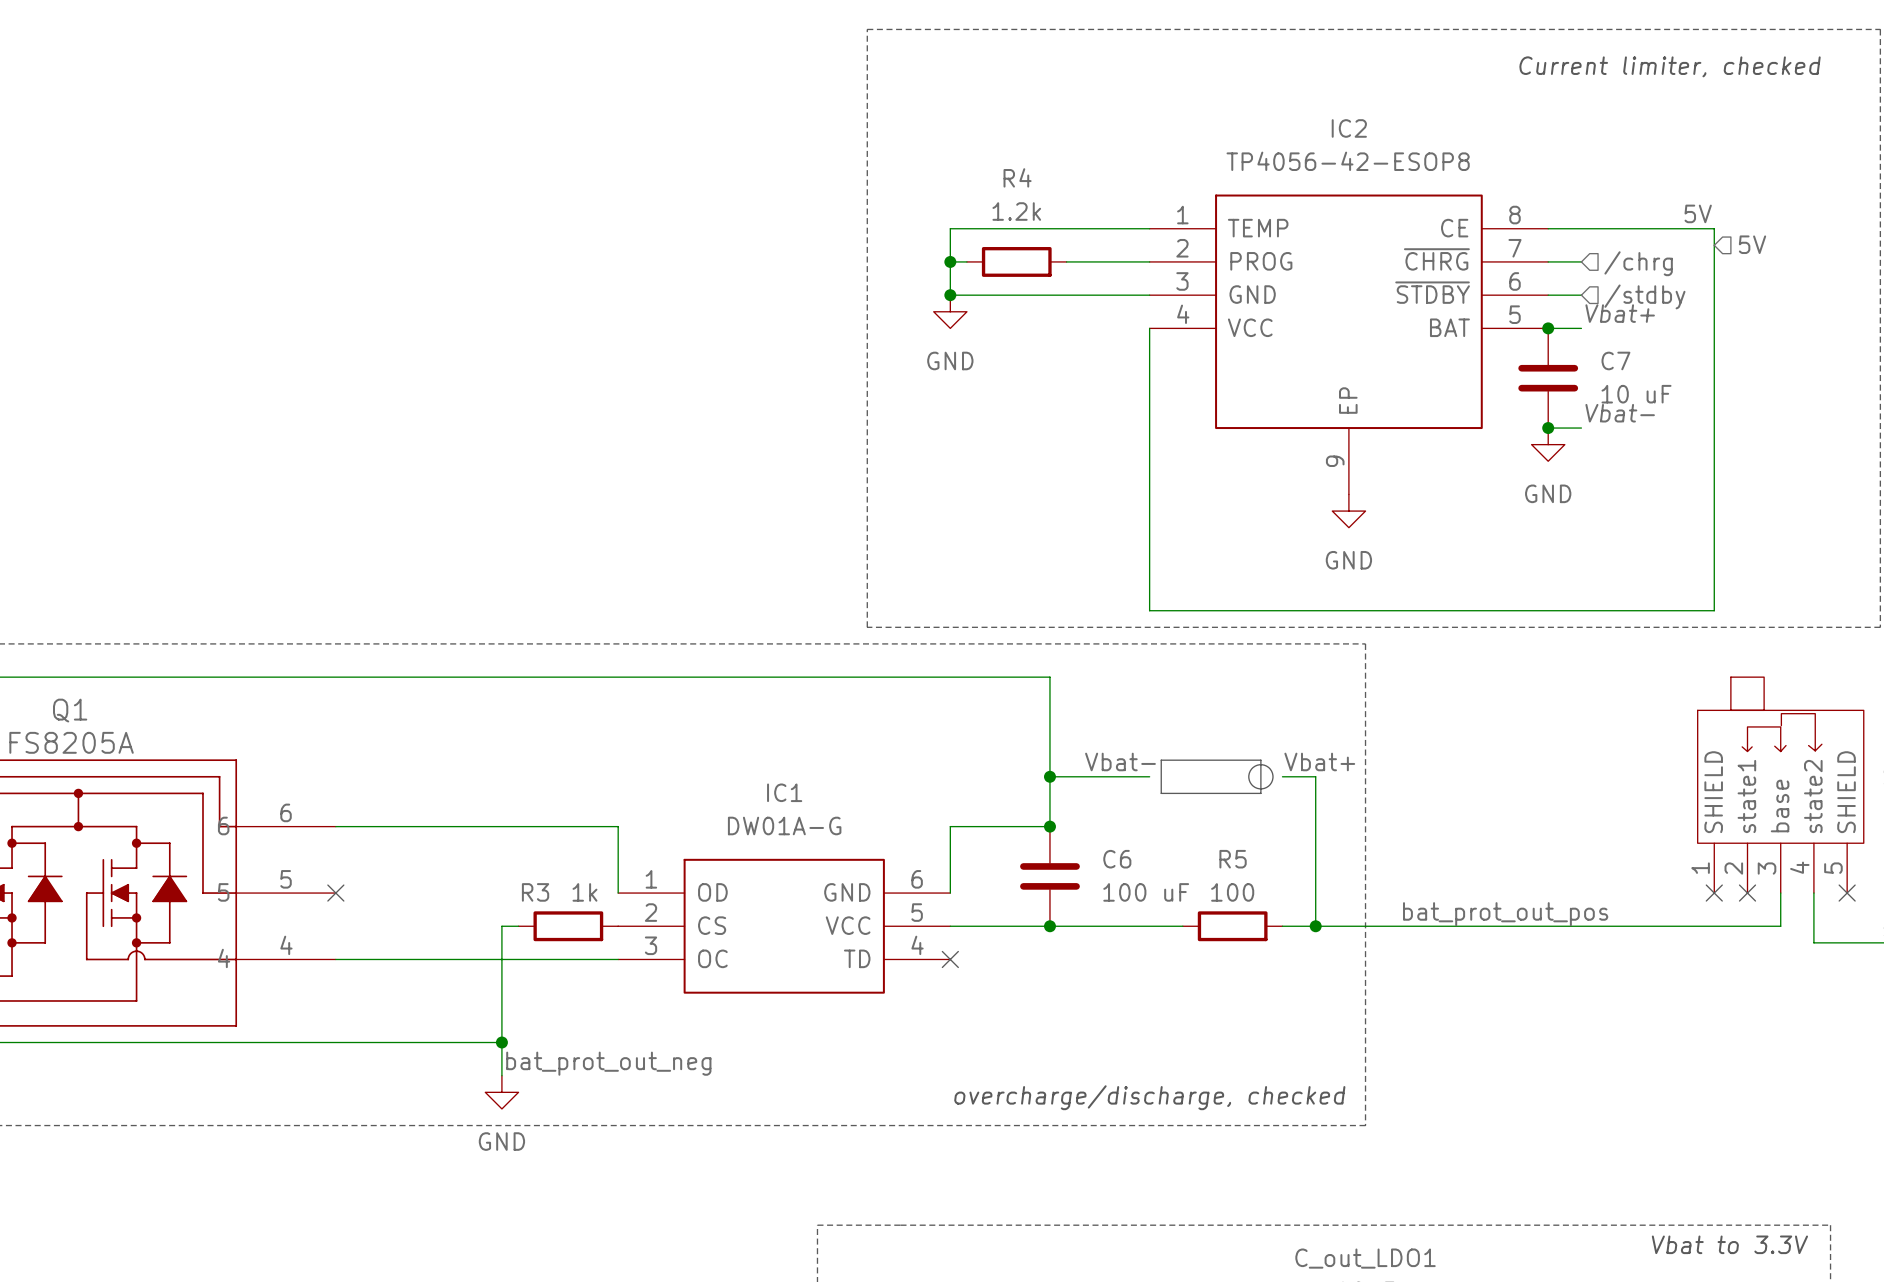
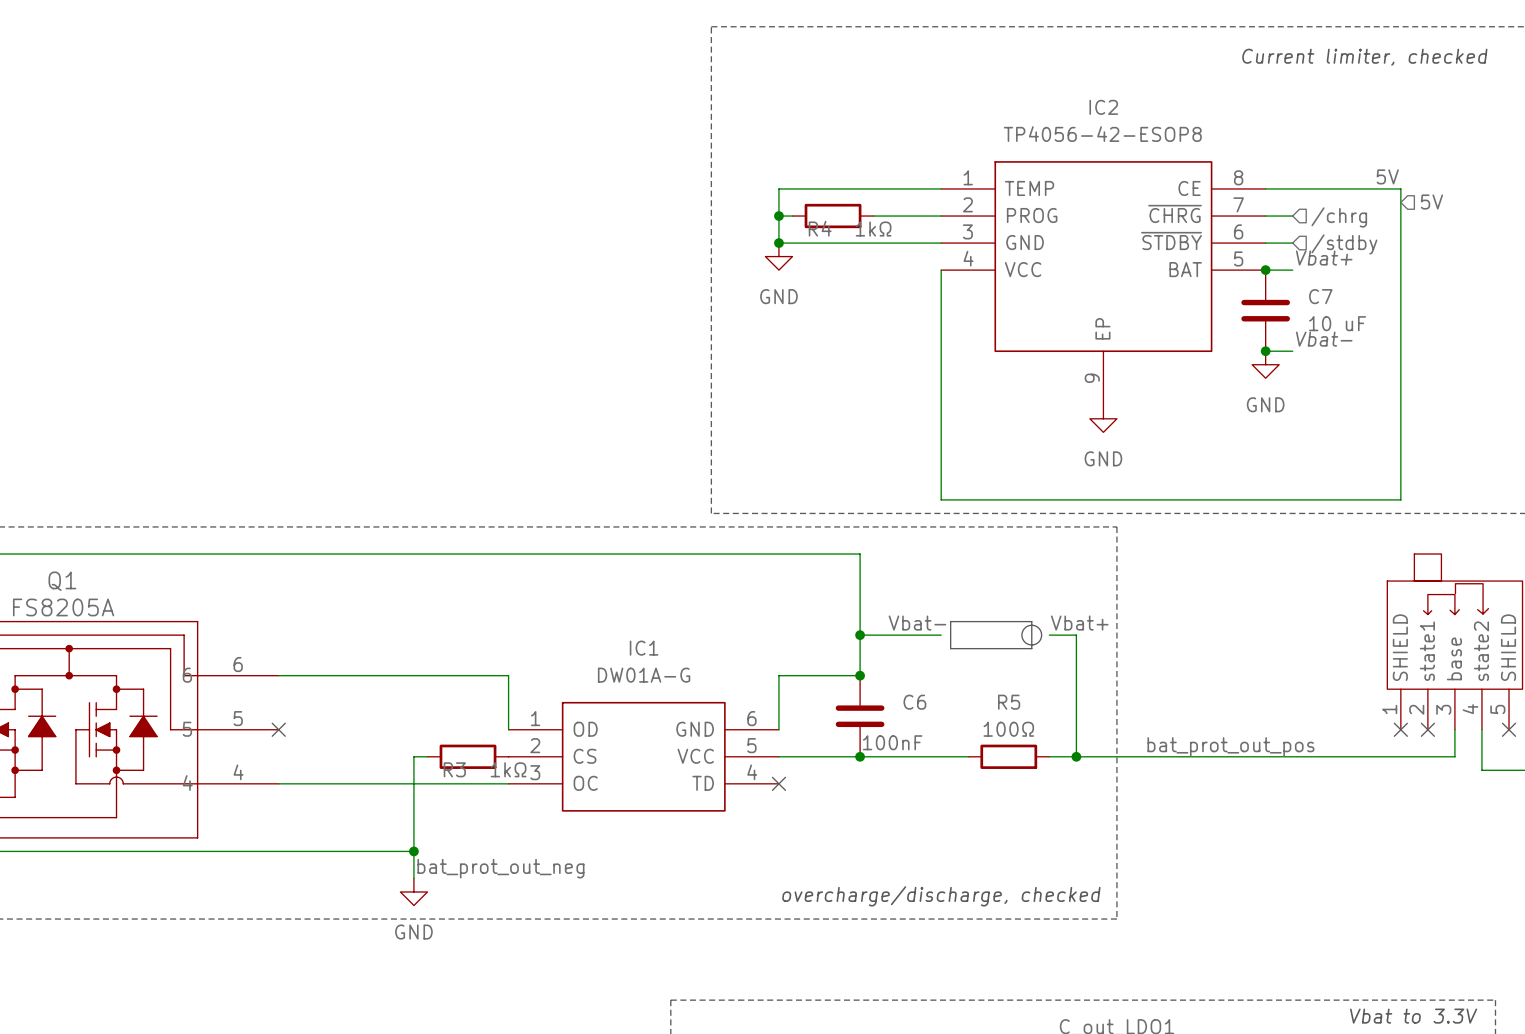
R4 name position: R4 (1017, 177) -> R4 (820, 228)
R4 value: 1.2k (1016, 211) -> 1kΩ (873, 229)
R3 name position: R3 (535, 892) -> R3 (454, 769)
R3 value: 1k (584, 892) -> 1kΩ (508, 769)
C6 value: 100 uF (1146, 892) -> 100nF (892, 742)
R5 value: 100 (1232, 892) -> 100Ω (1008, 729)

